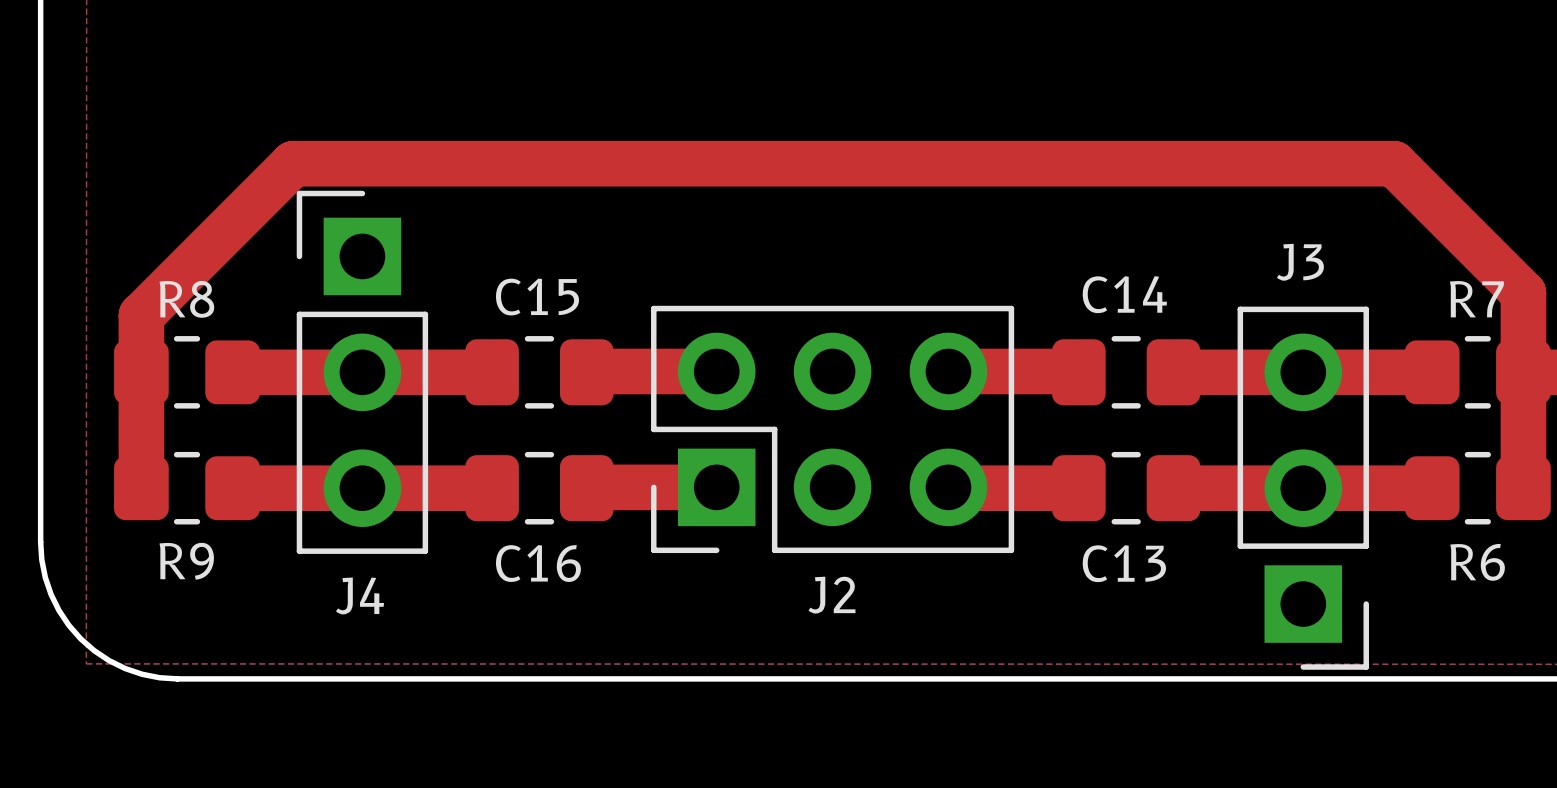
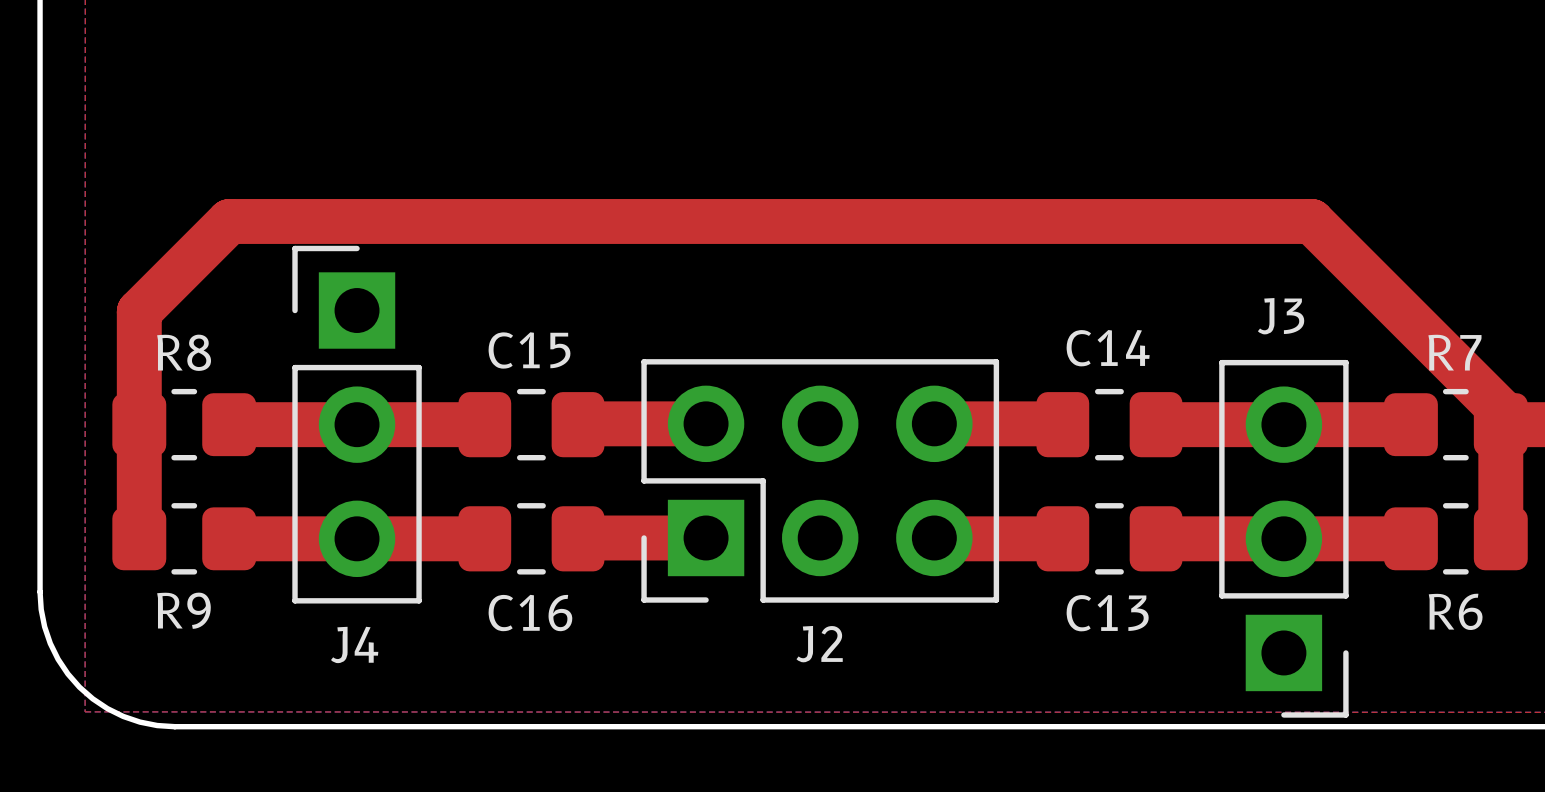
top track: (141, 315) (293, 163) (1394, 163) (1523, 293) (1523, 358) -> (139, 368) (139, 311) (229, 221) (1311, 221) (1500, 410)

